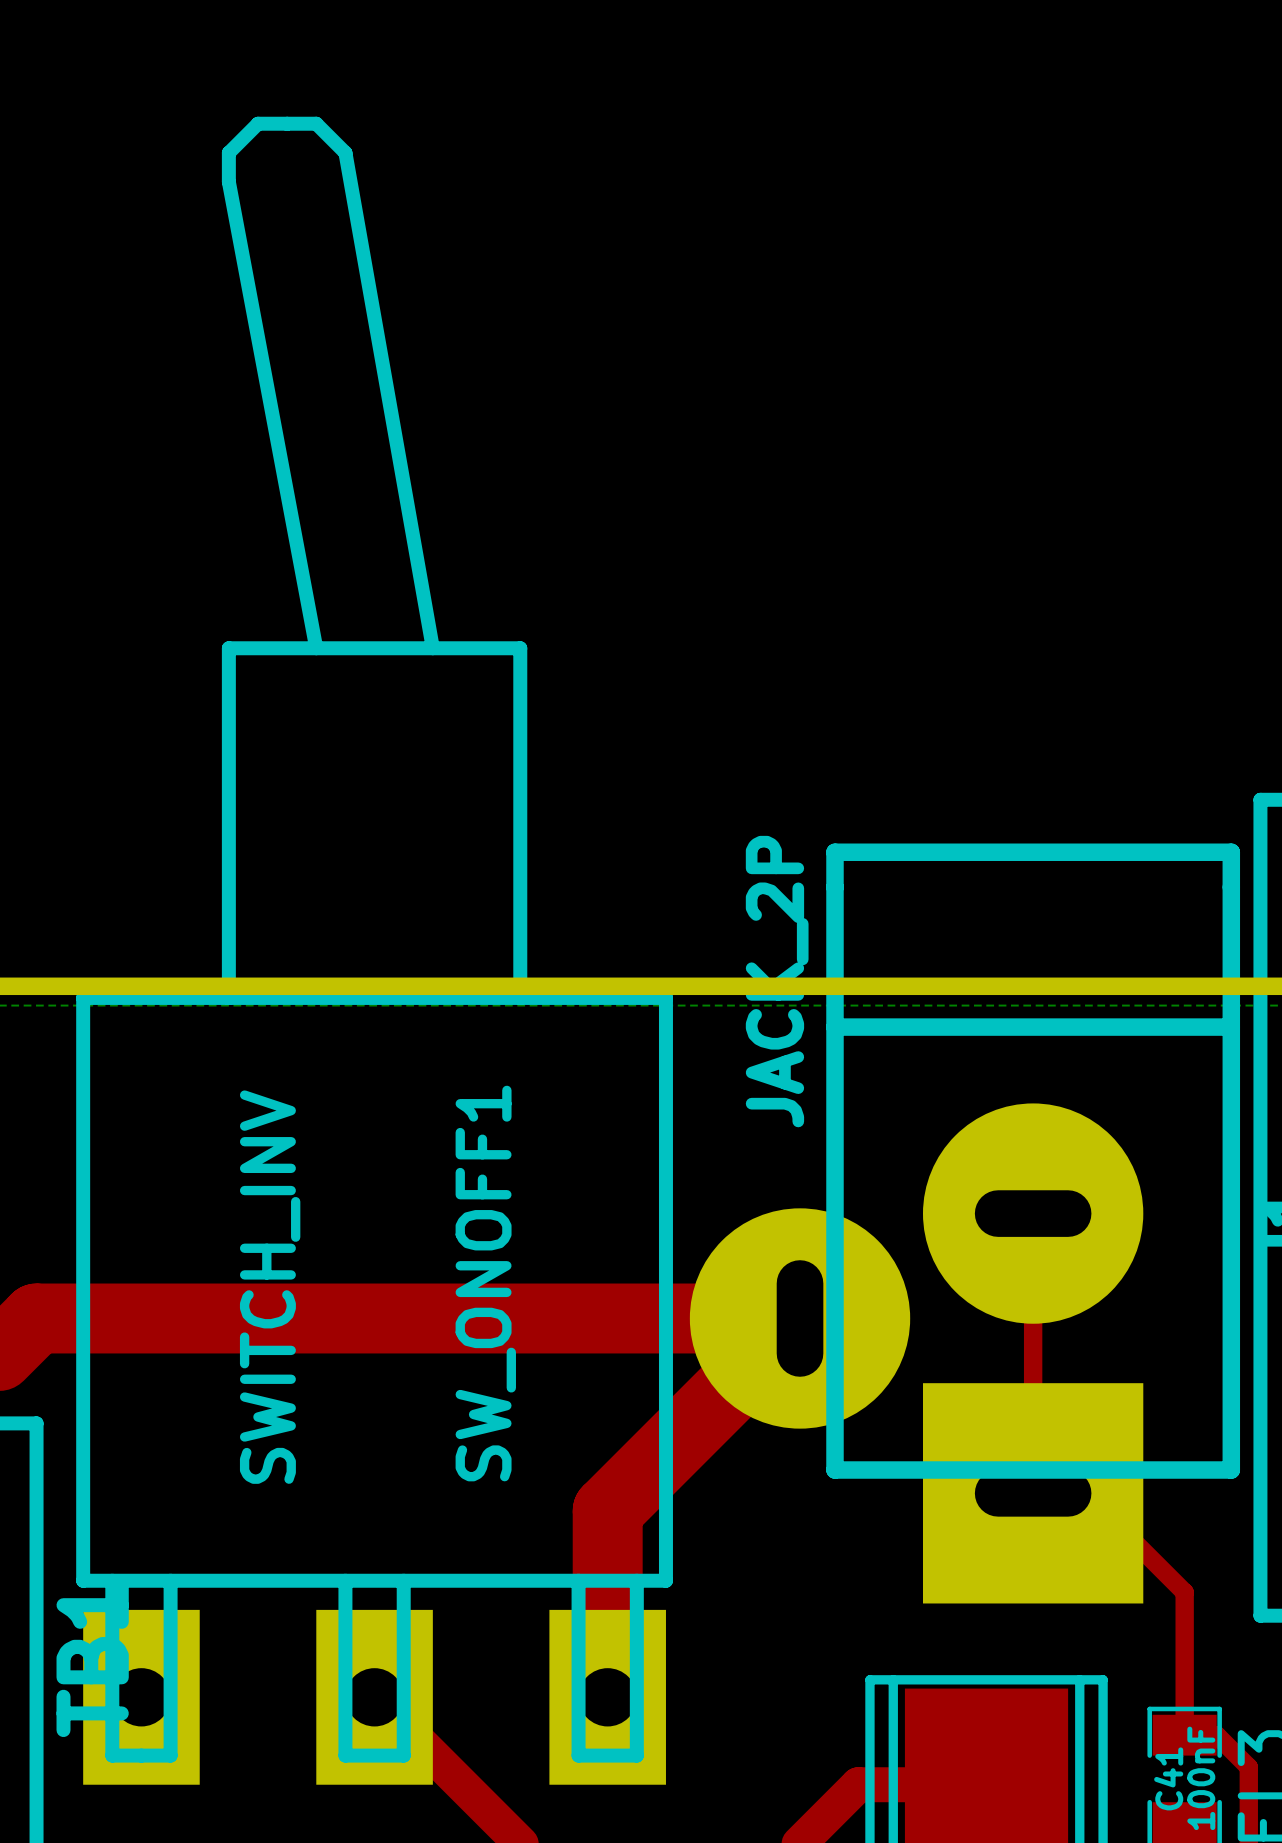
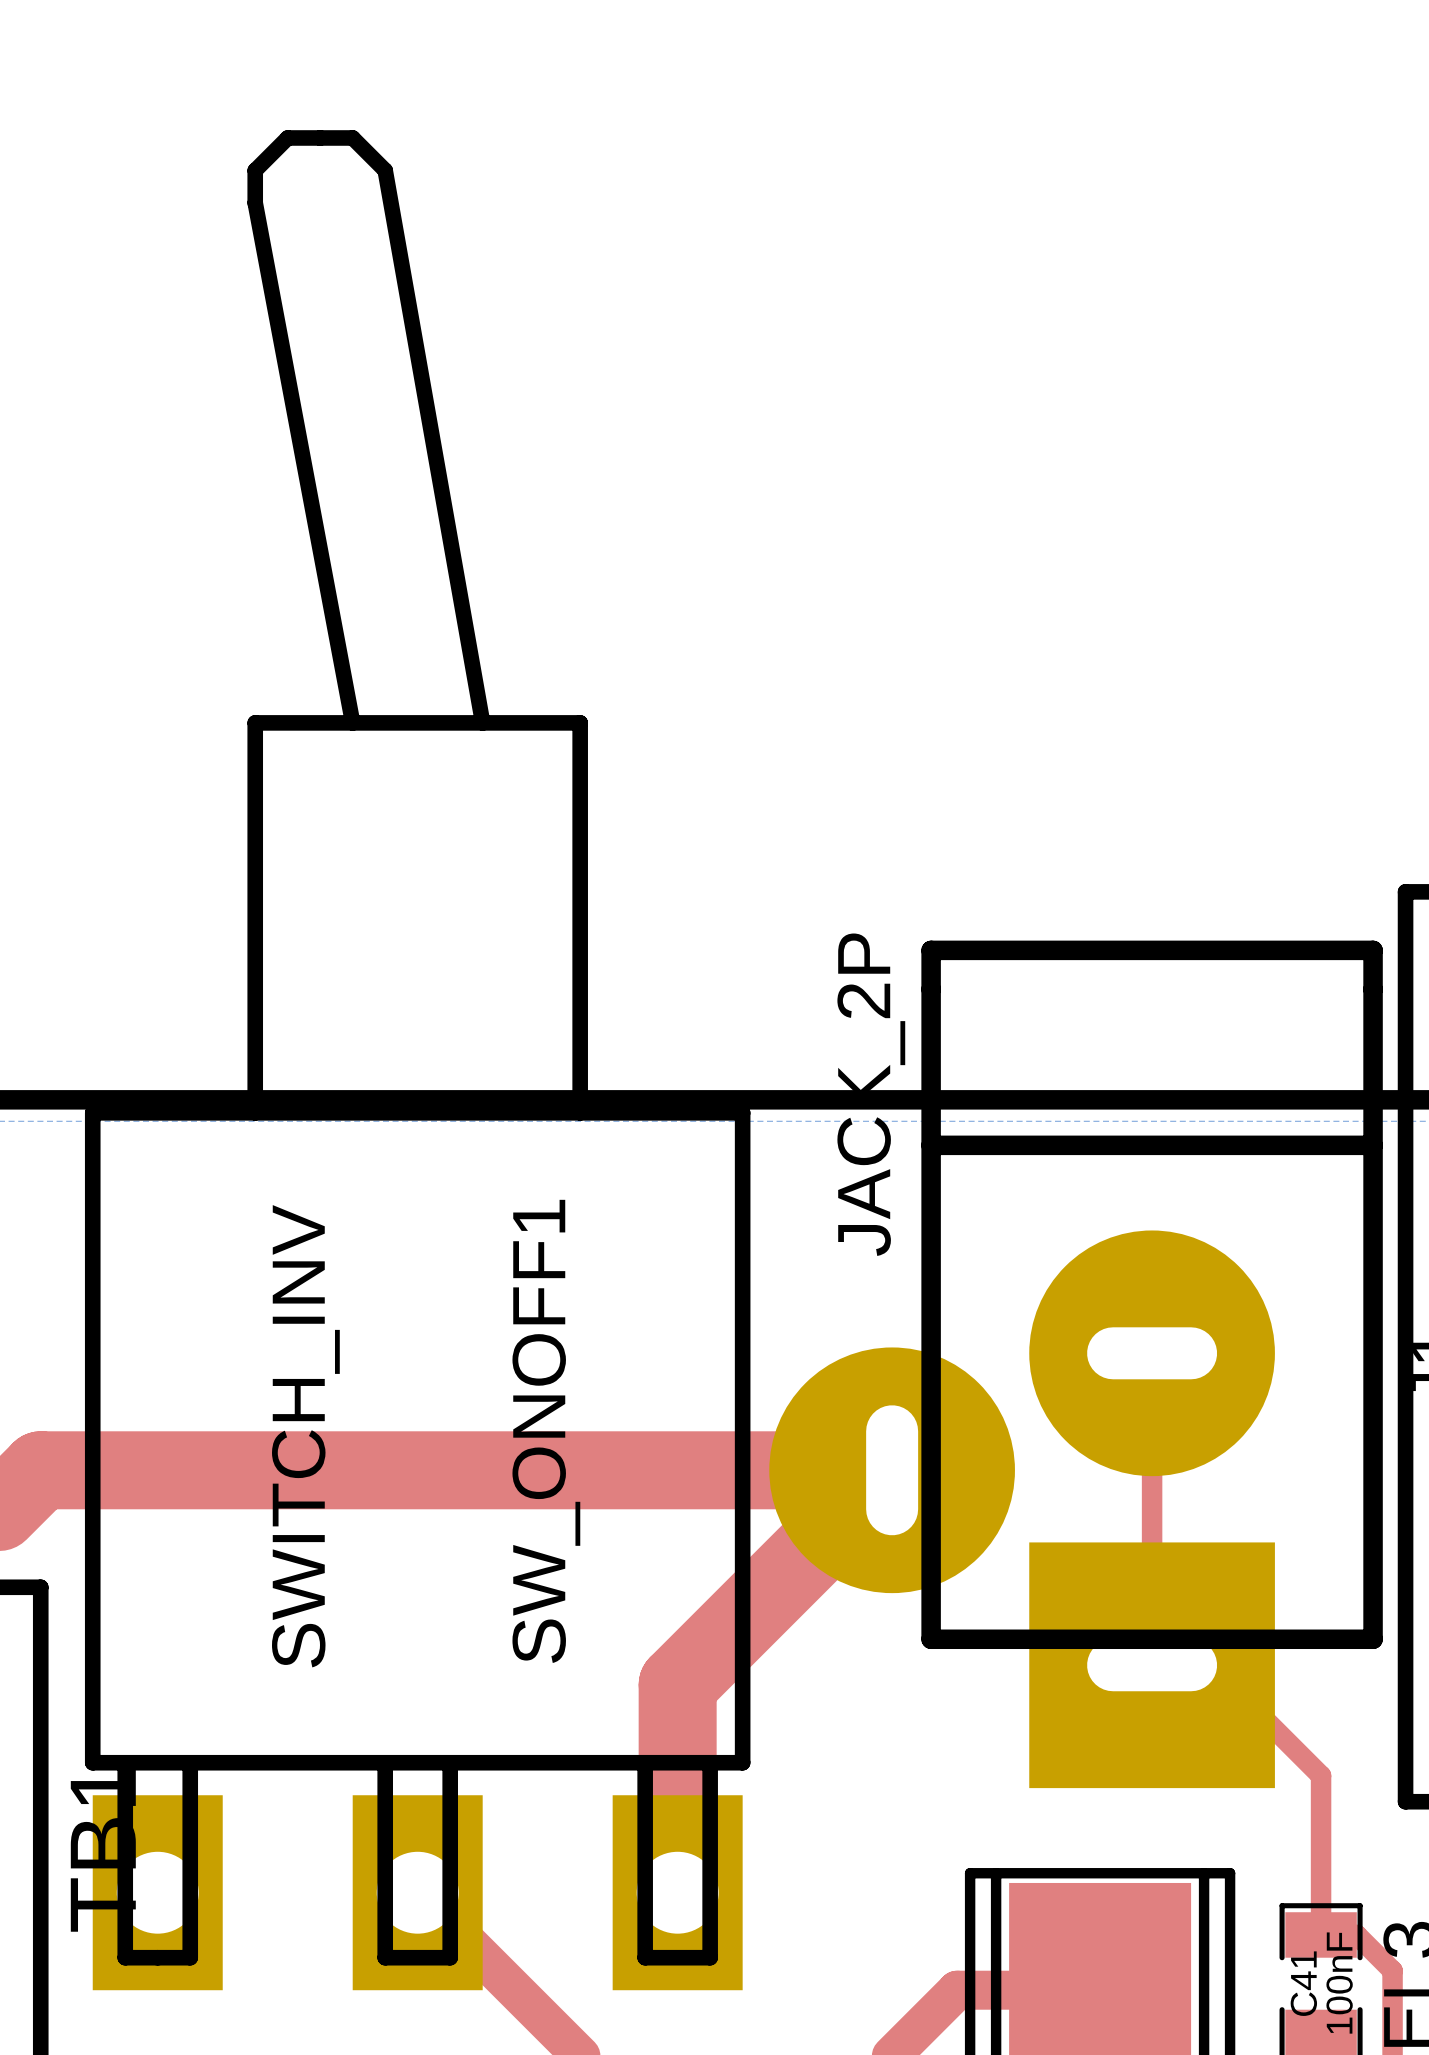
SW_ONOFF1 footprint: [76, 116, 673, 1785] -> [84, 130, 751, 1991]

